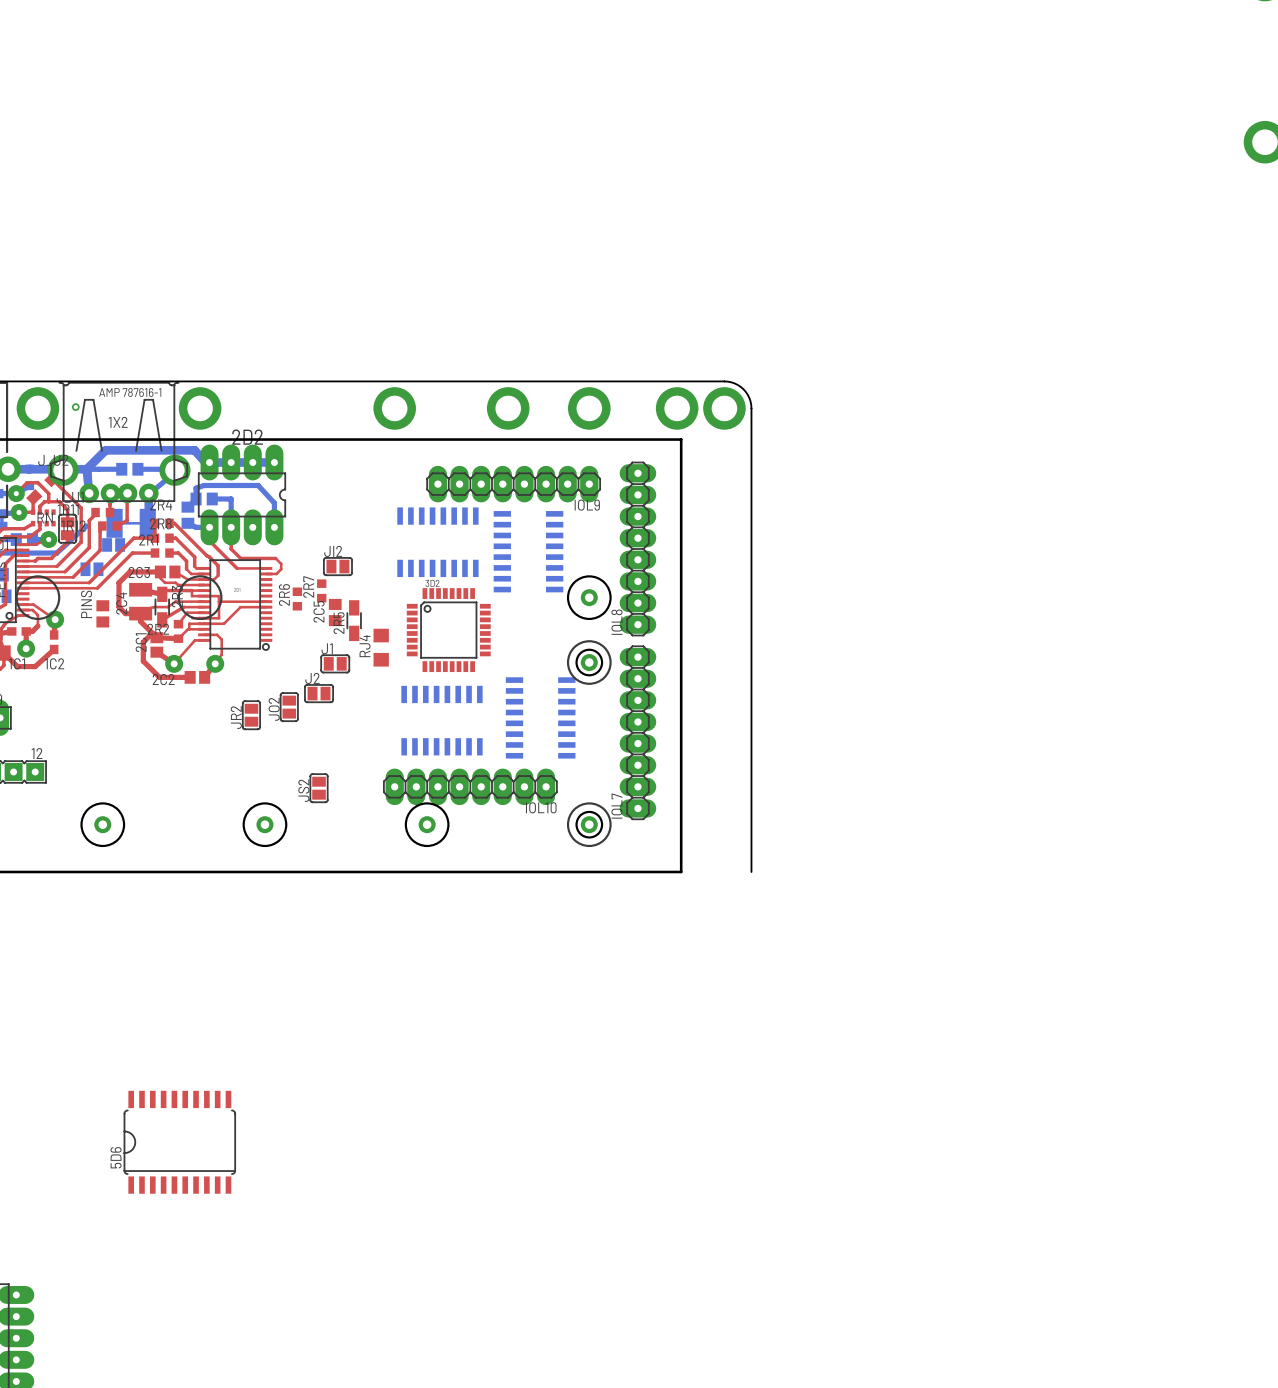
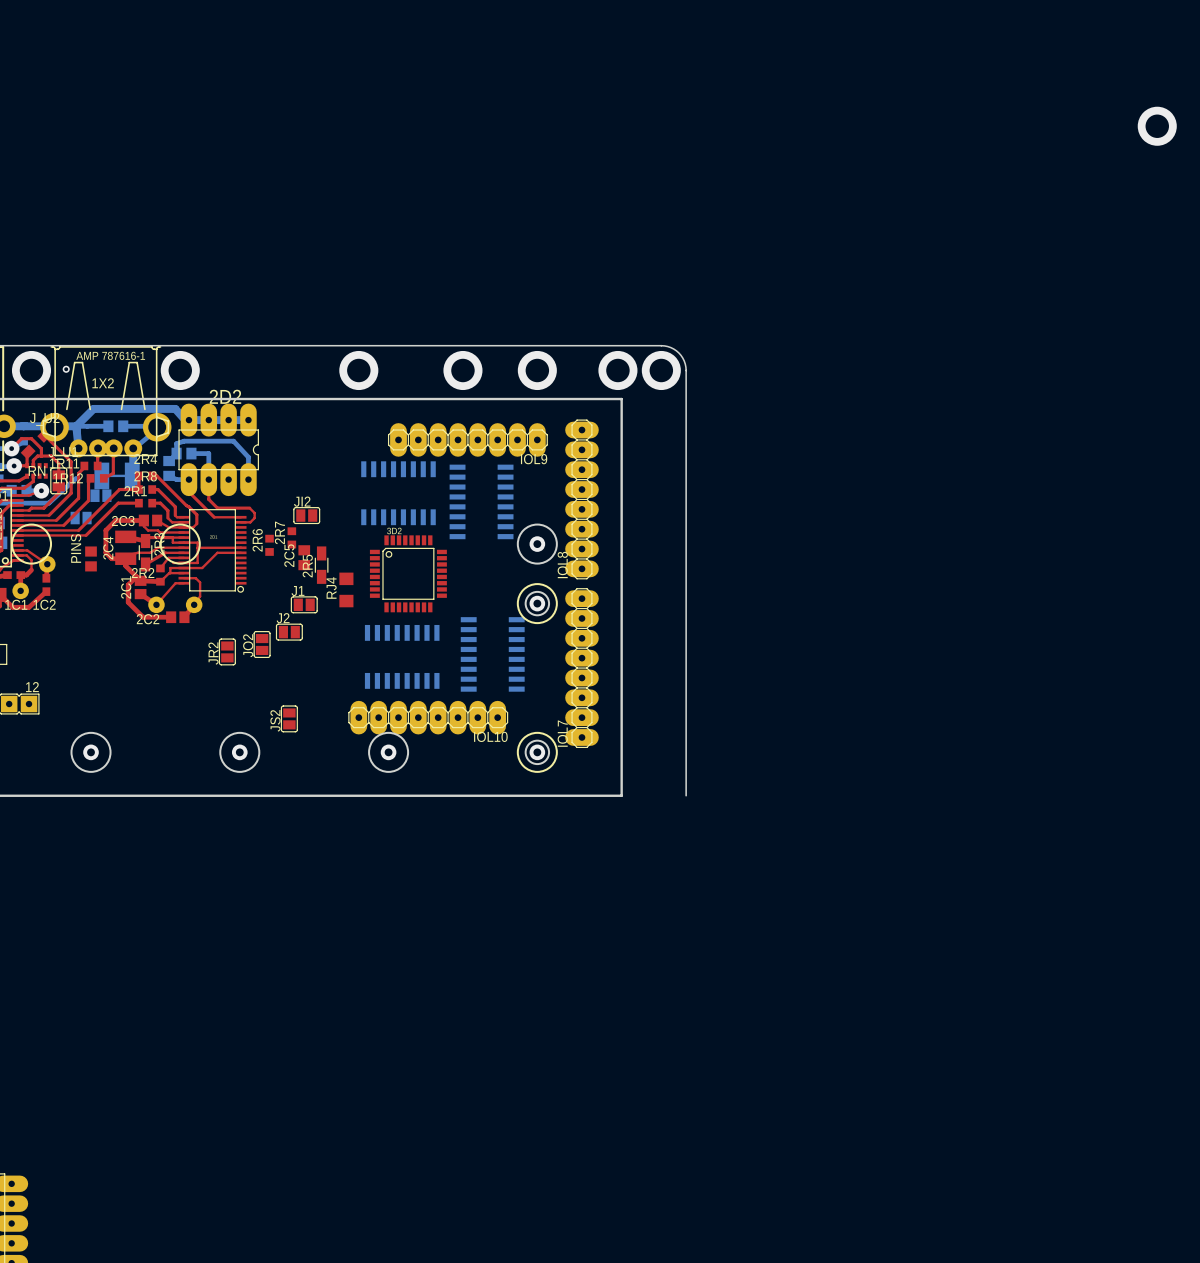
5D6: (179, 1142) -> none

